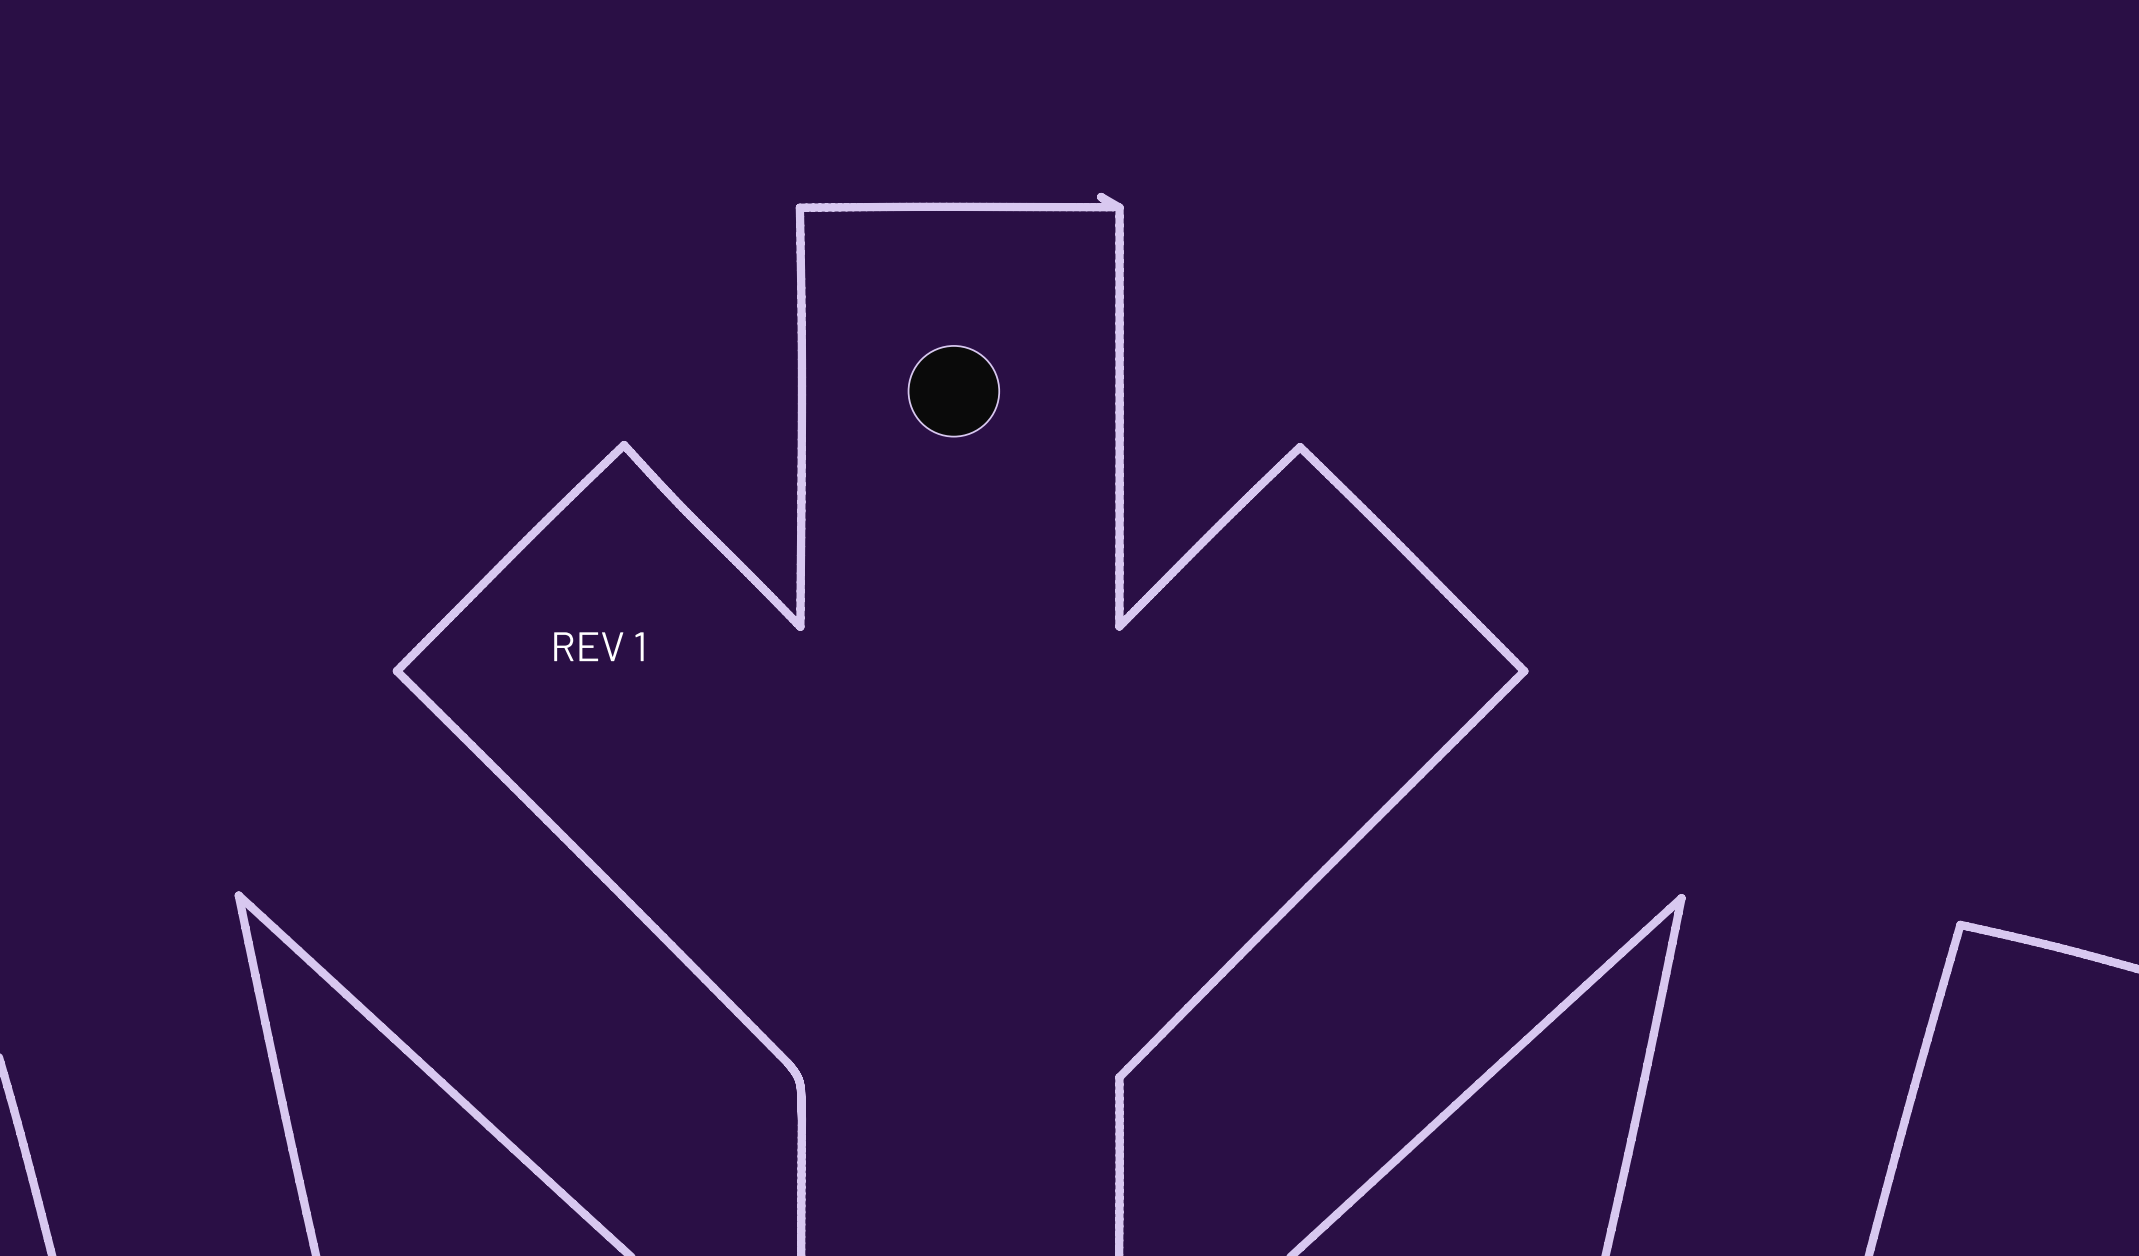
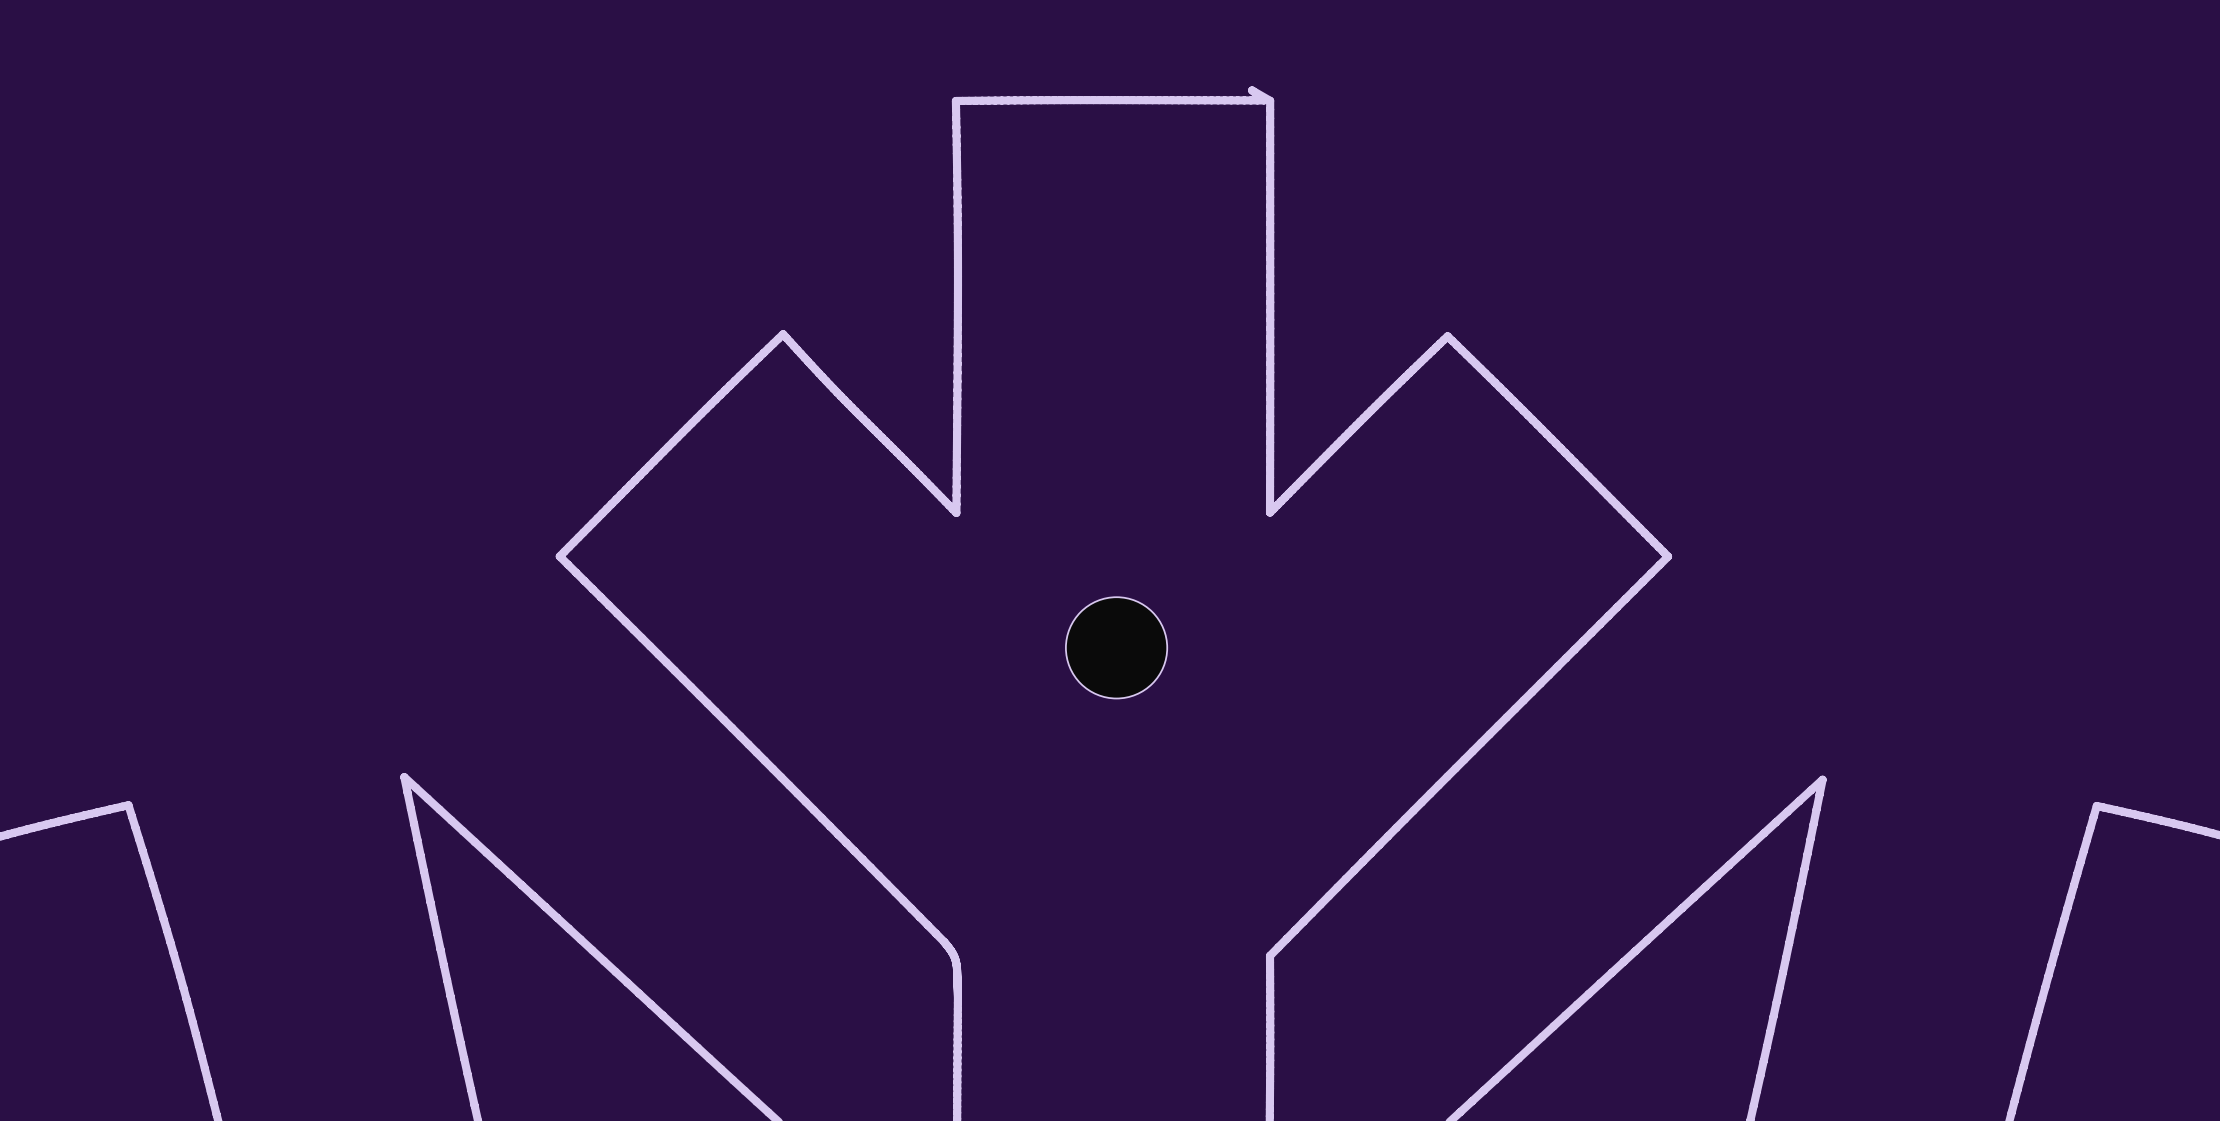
part: (953, 391) -> none
text: REV 1 (598, 646) -> none
part: none -> (1116, 647)

